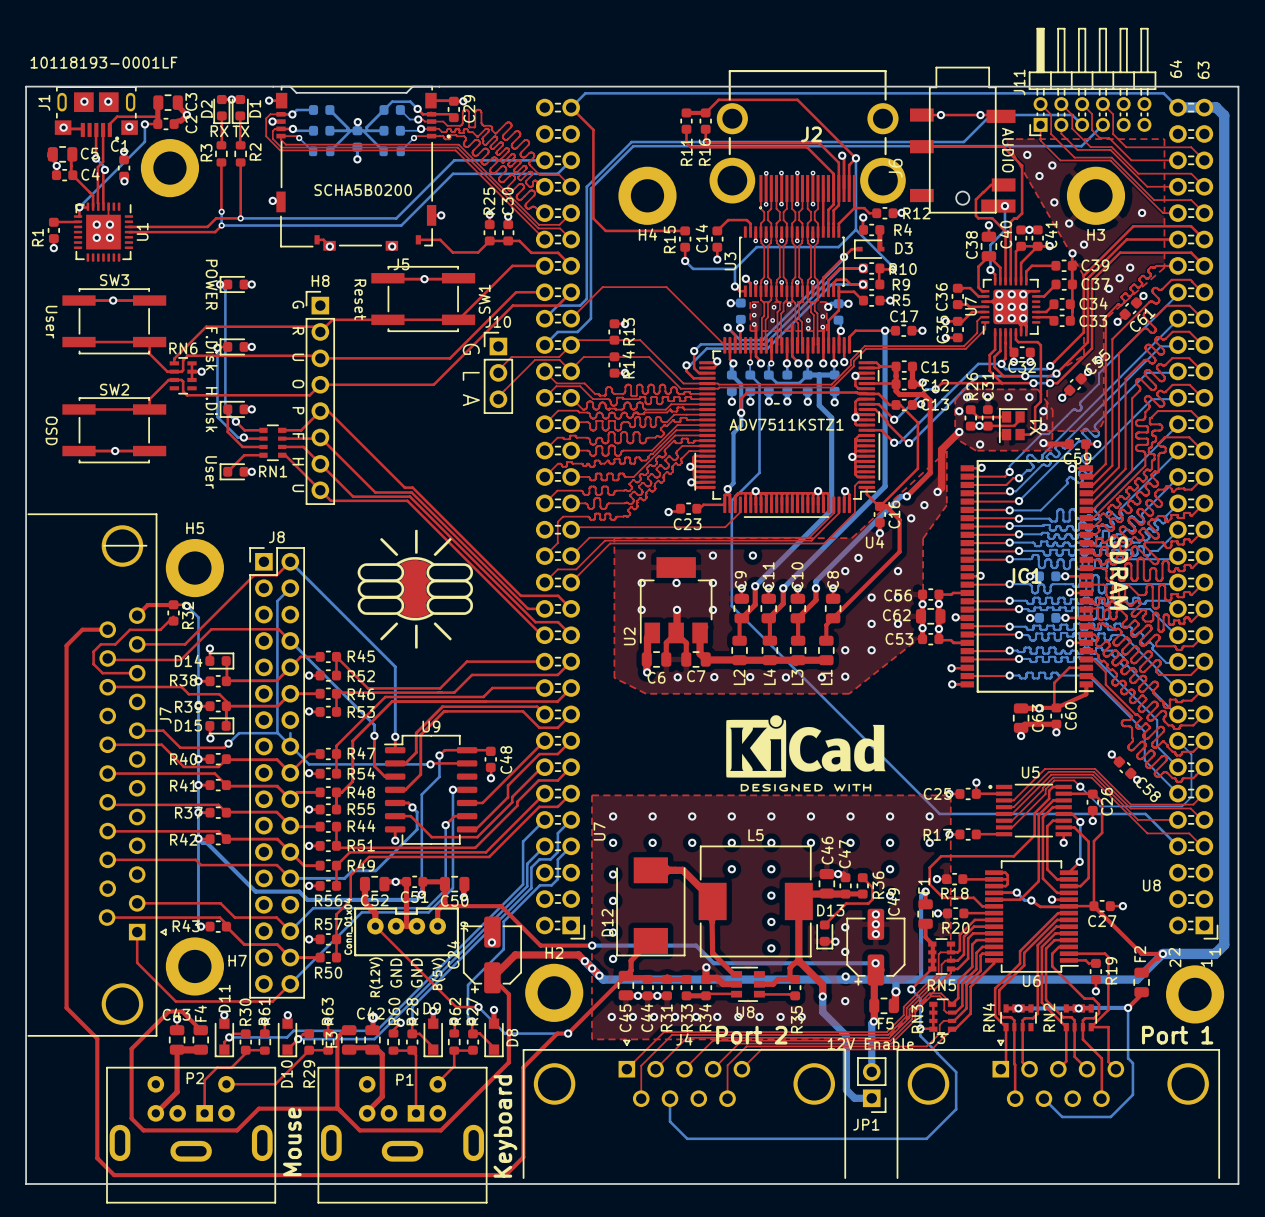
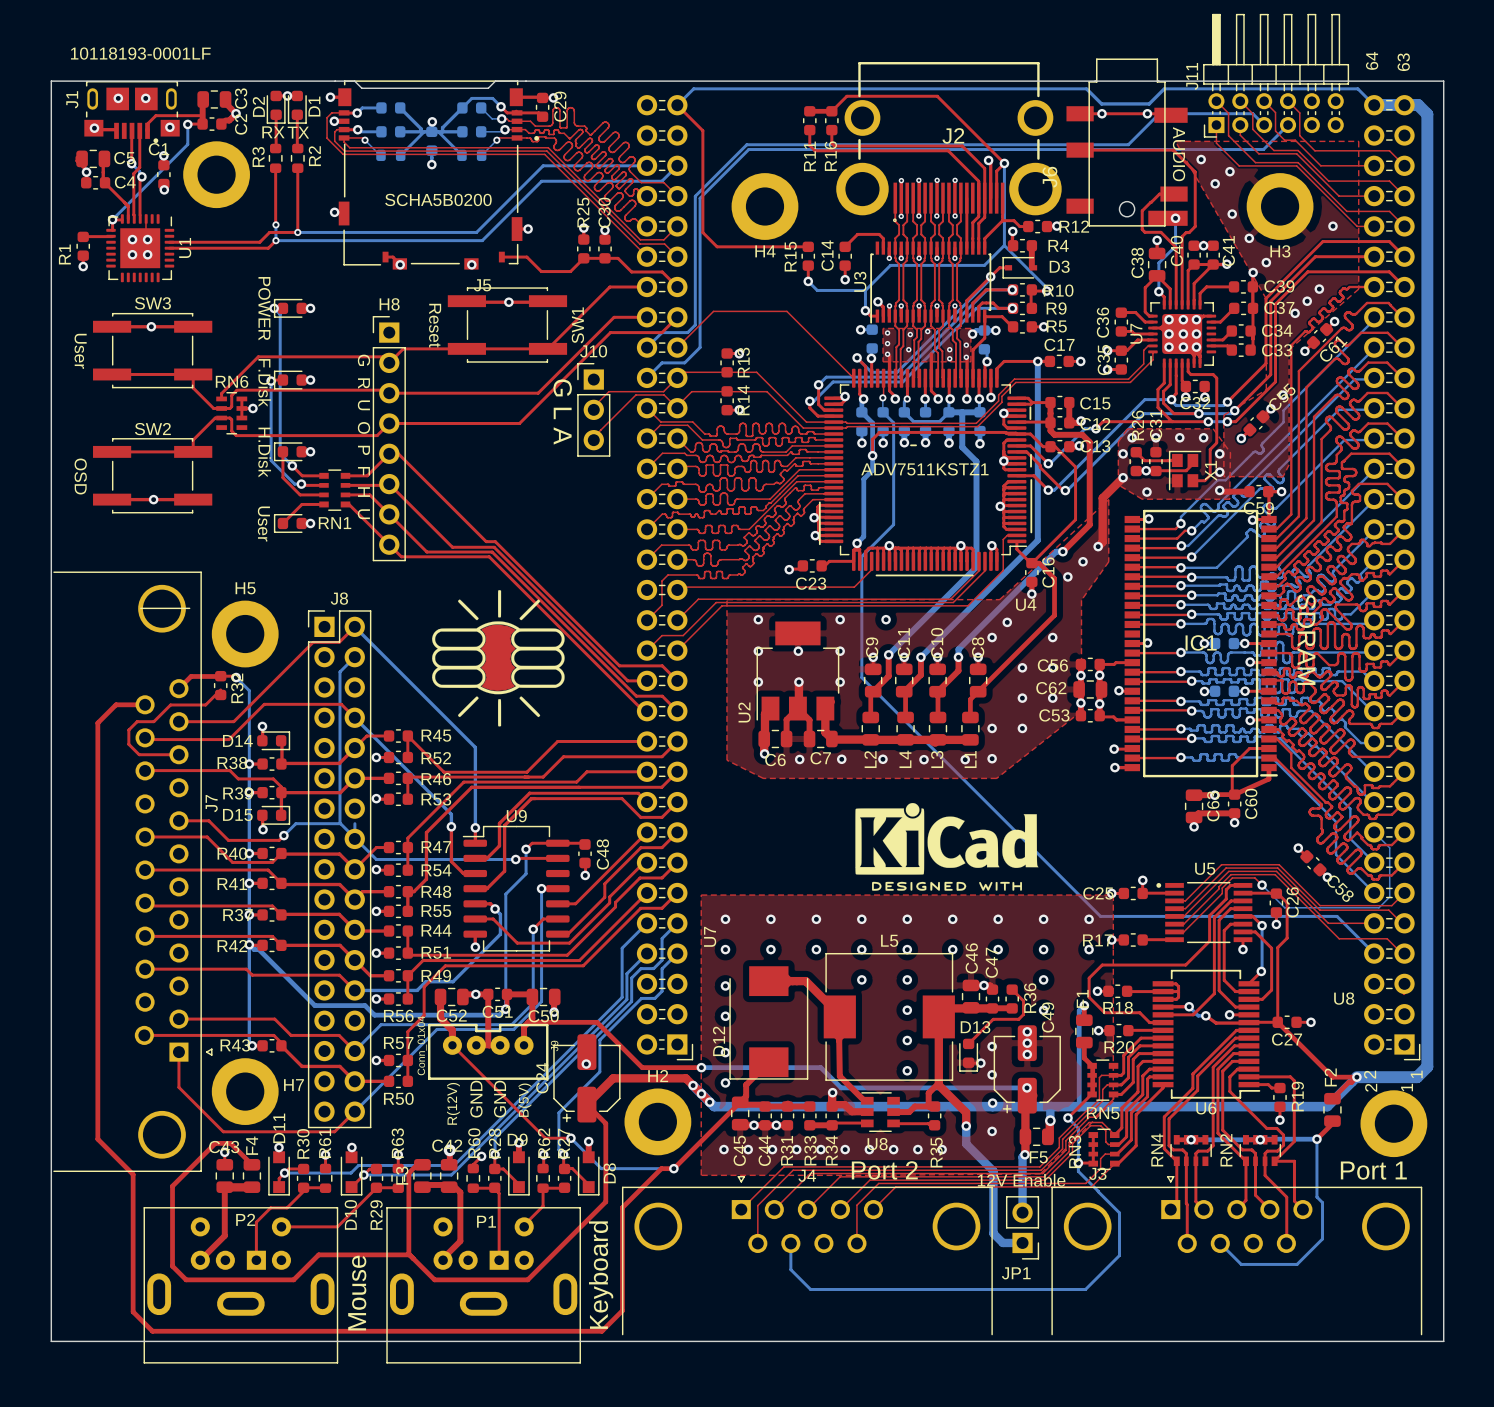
bottom track: (927, 93) (995, 93) -> (1086, 88) (1101, 103) (1149, 103) (1164, 88)

